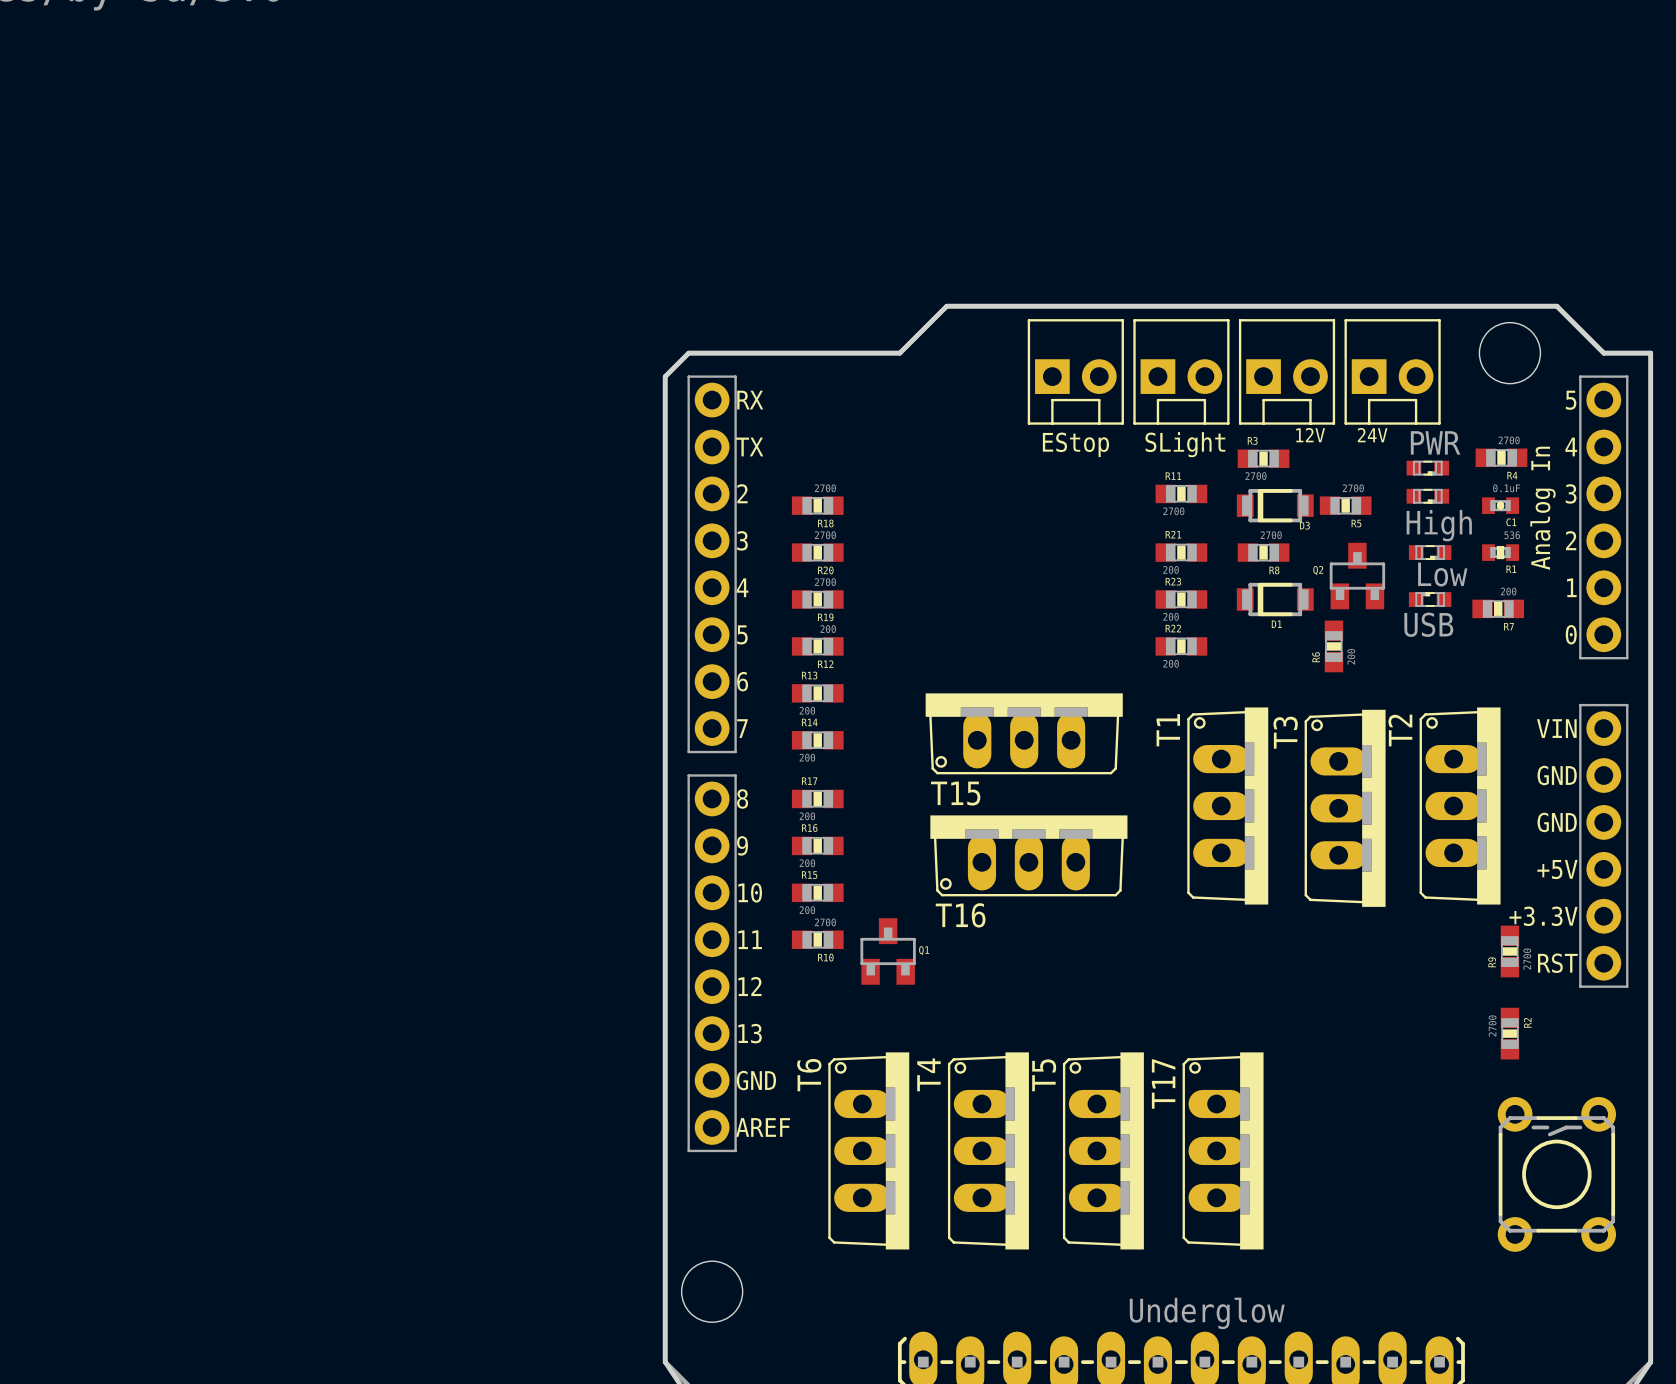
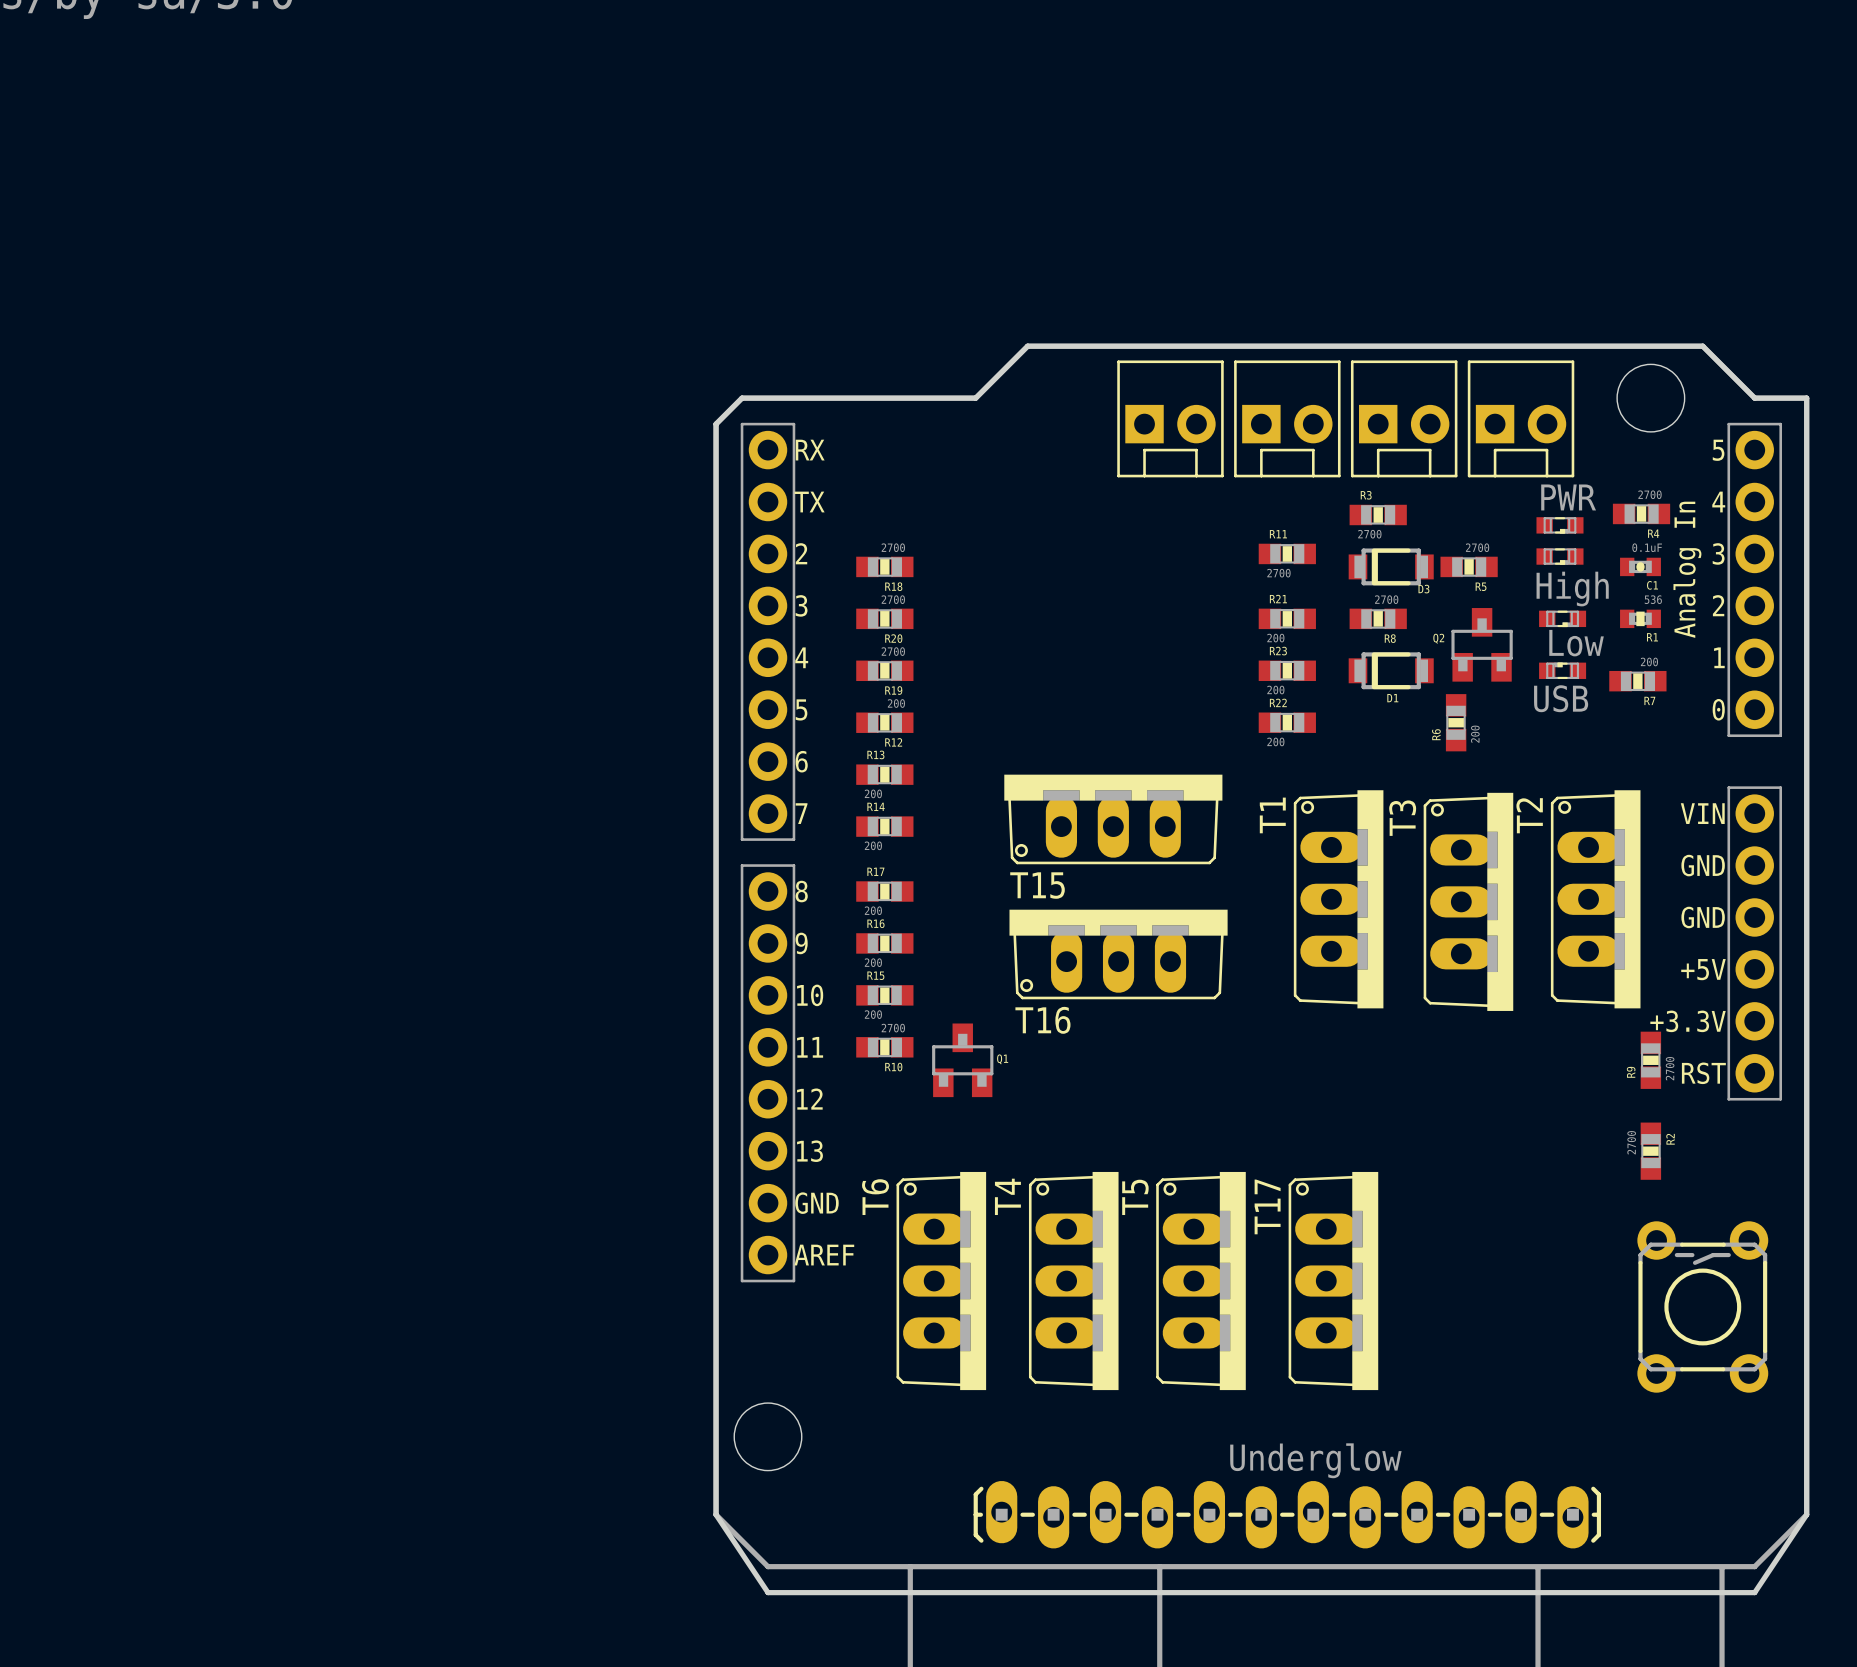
text: 12V (1310, 435) -> none
text: 24V (1372, 435) -> none
text: EStop (1075, 444) -> none
text: SLight (1185, 444) -> none

